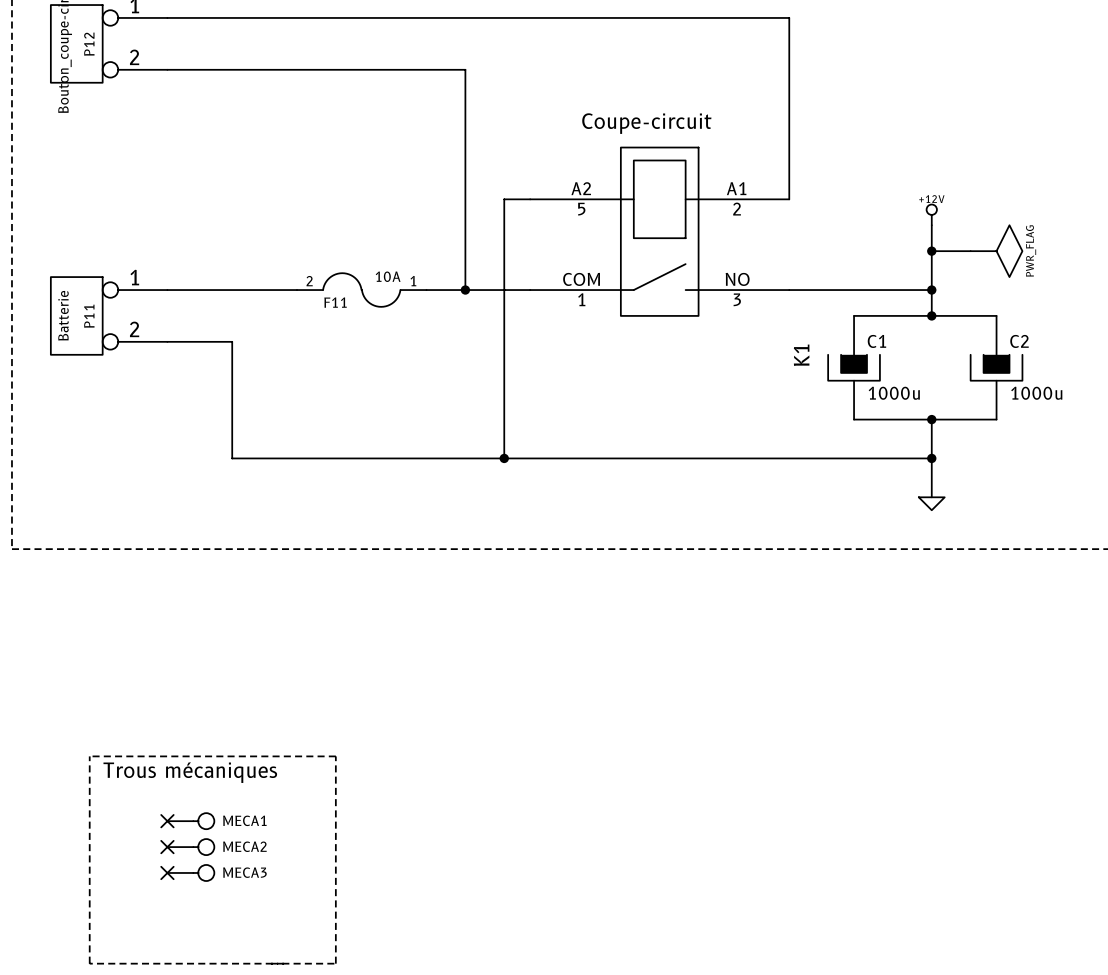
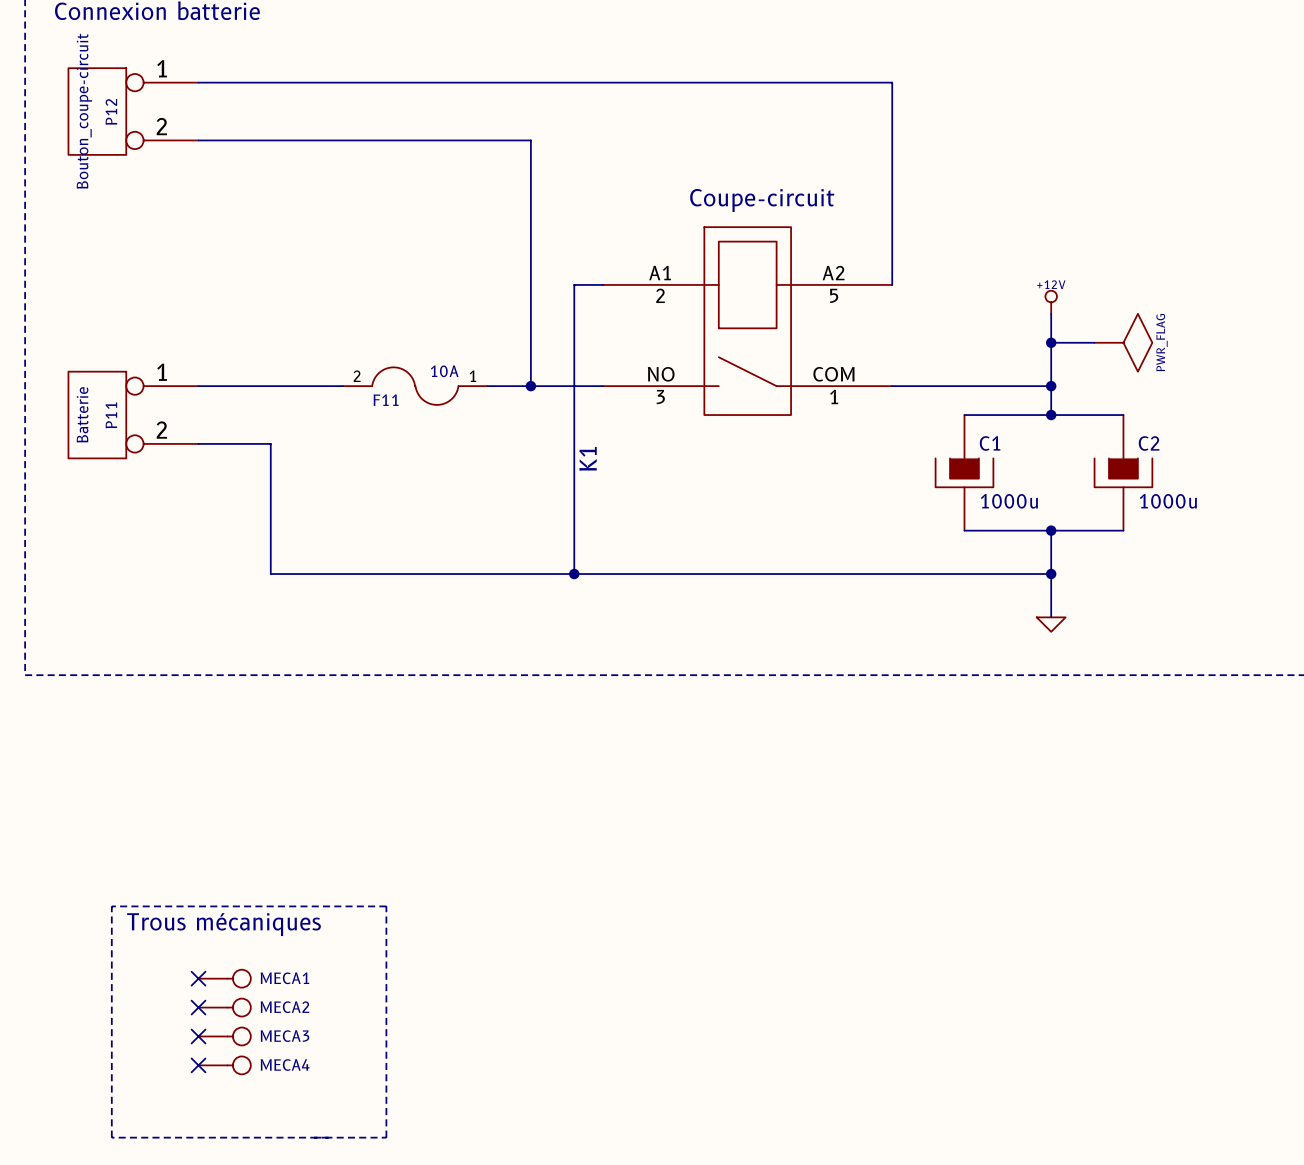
K1 flip: as is (659, 231) -> left-right (747, 321)
no-connect mark: none -> (198, 1065)
MECA4: none -> (224, 1065)

